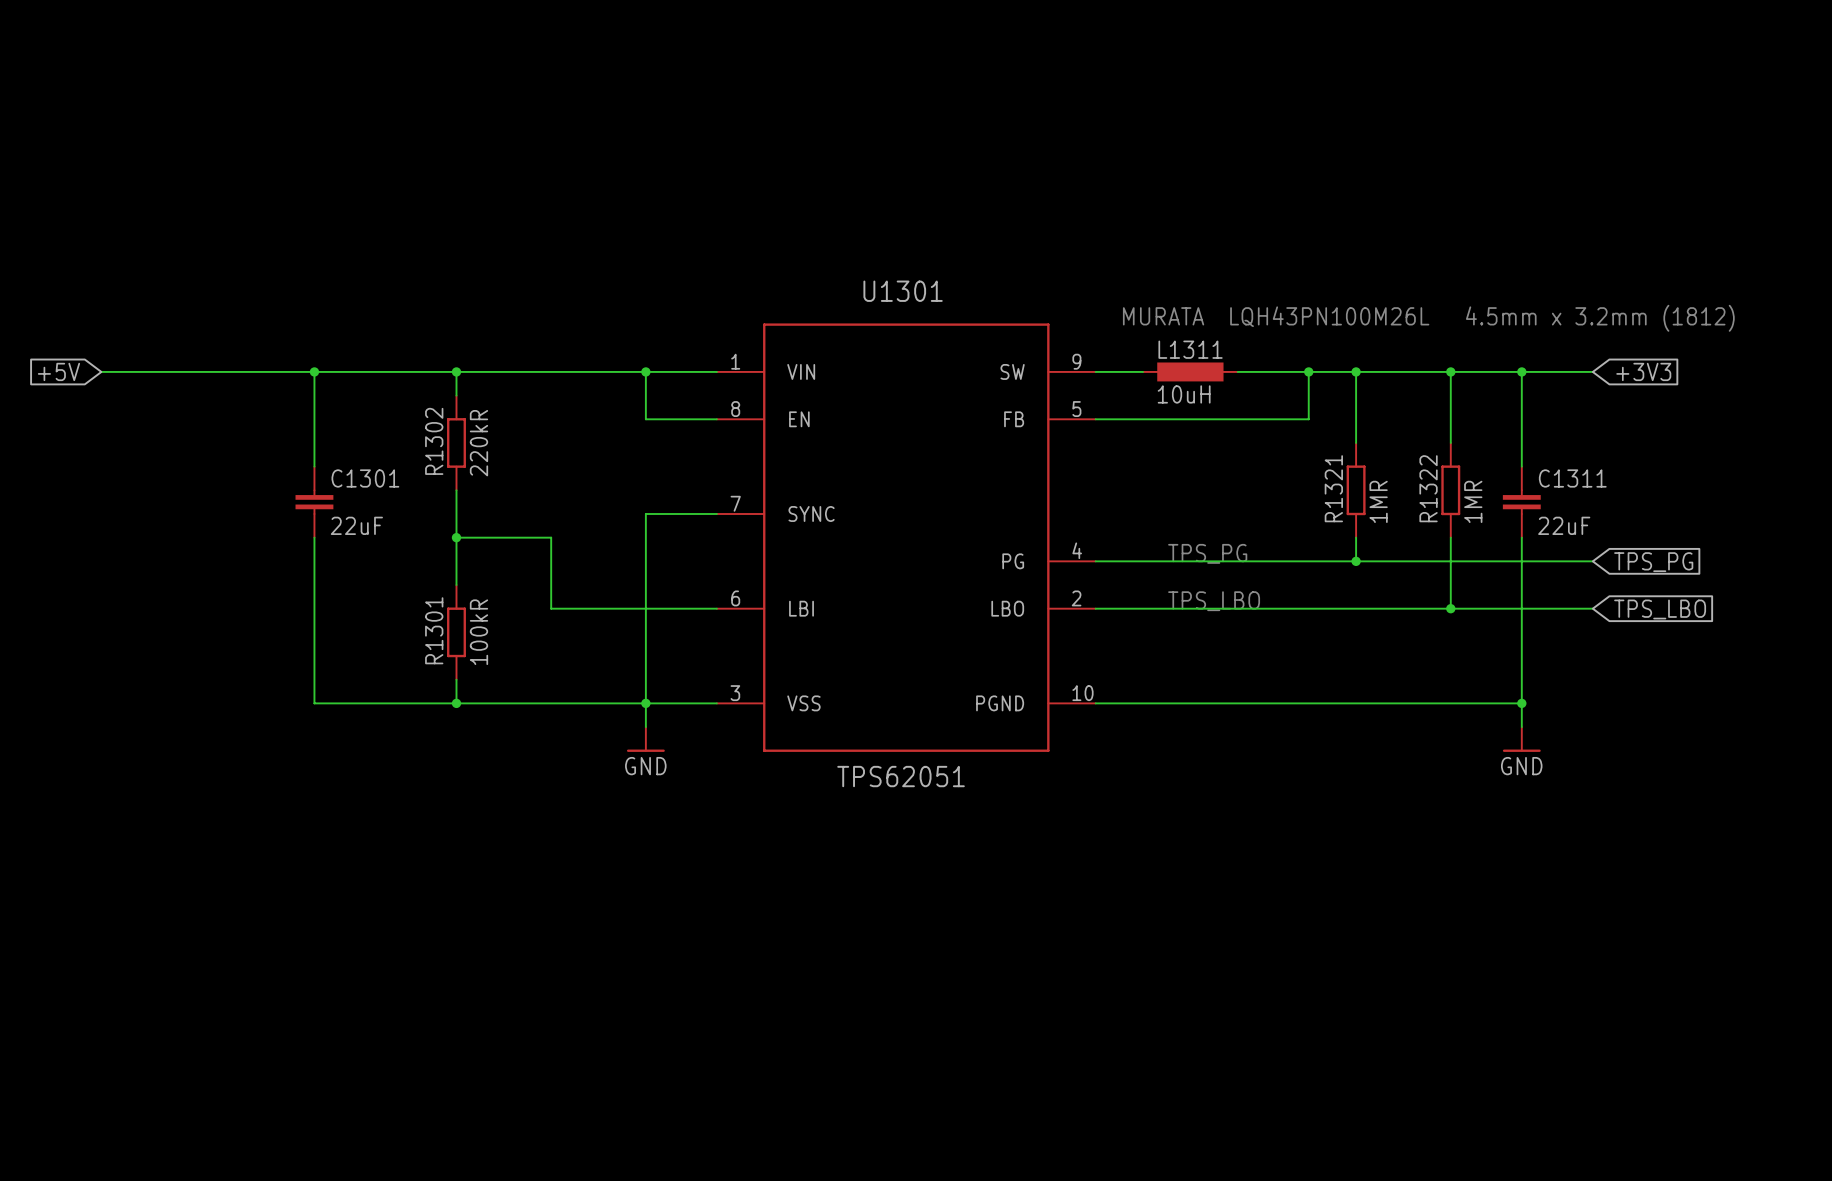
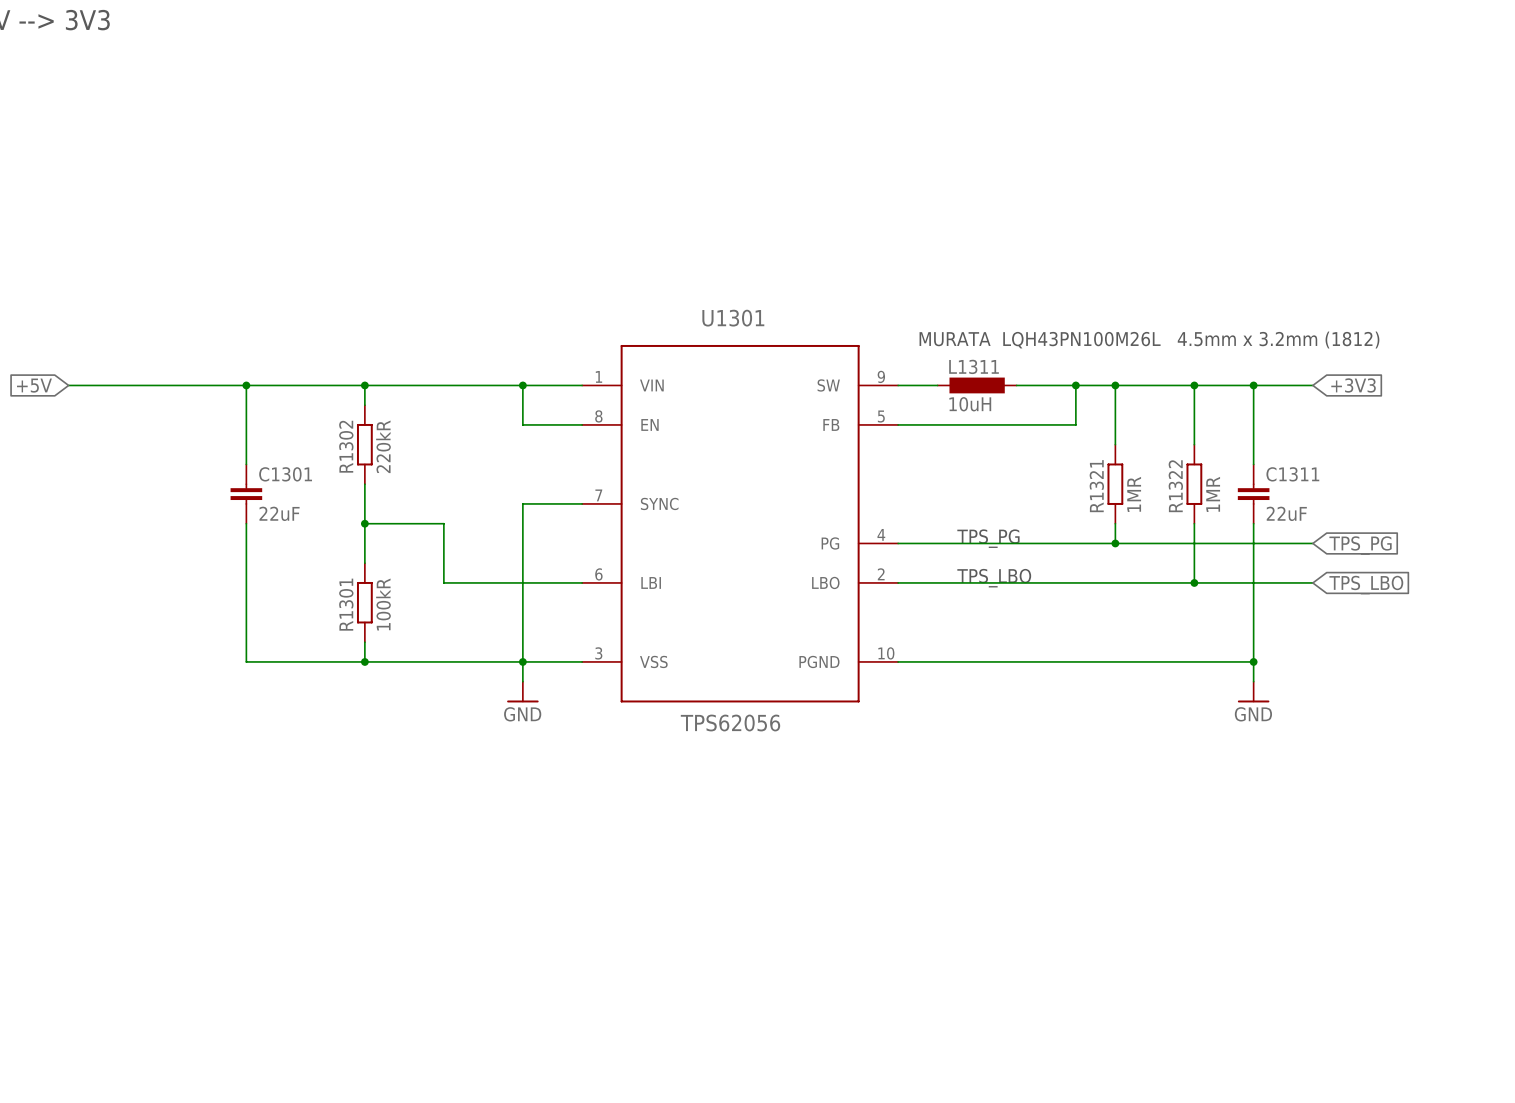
U1301 value: TPS62051 (901, 776) -> TPS62056 (730, 723)

